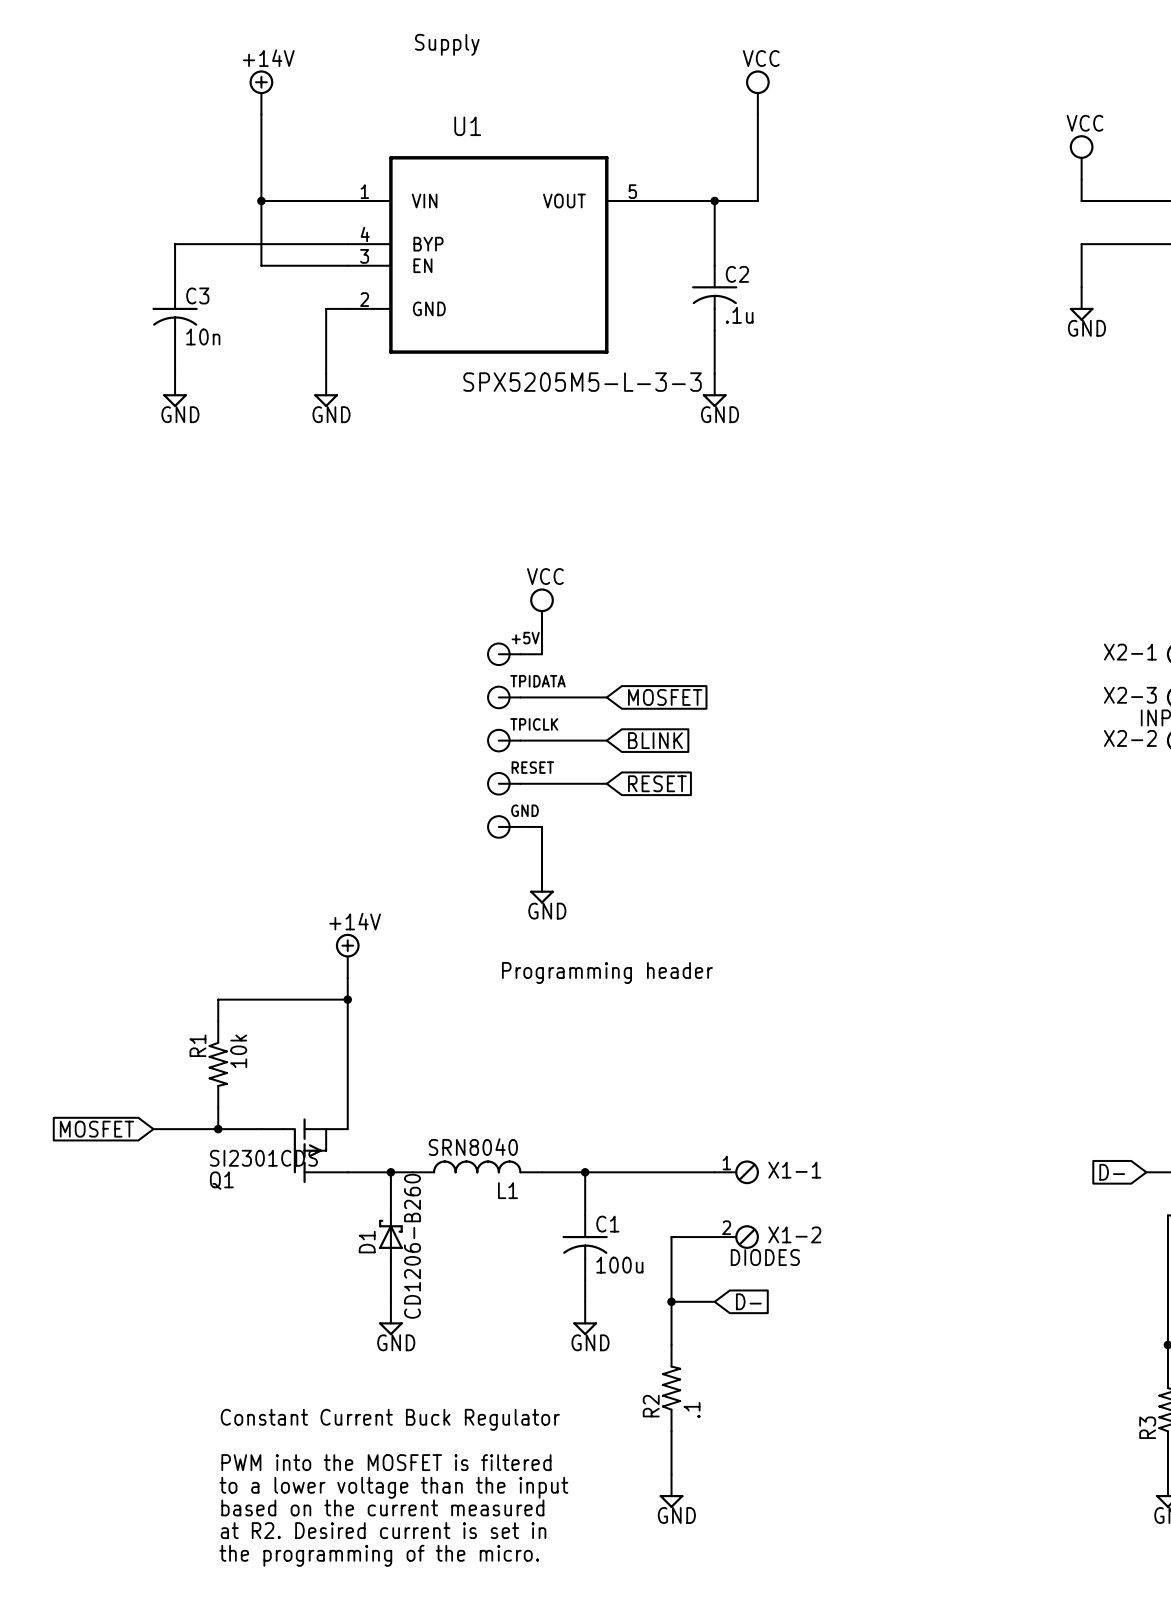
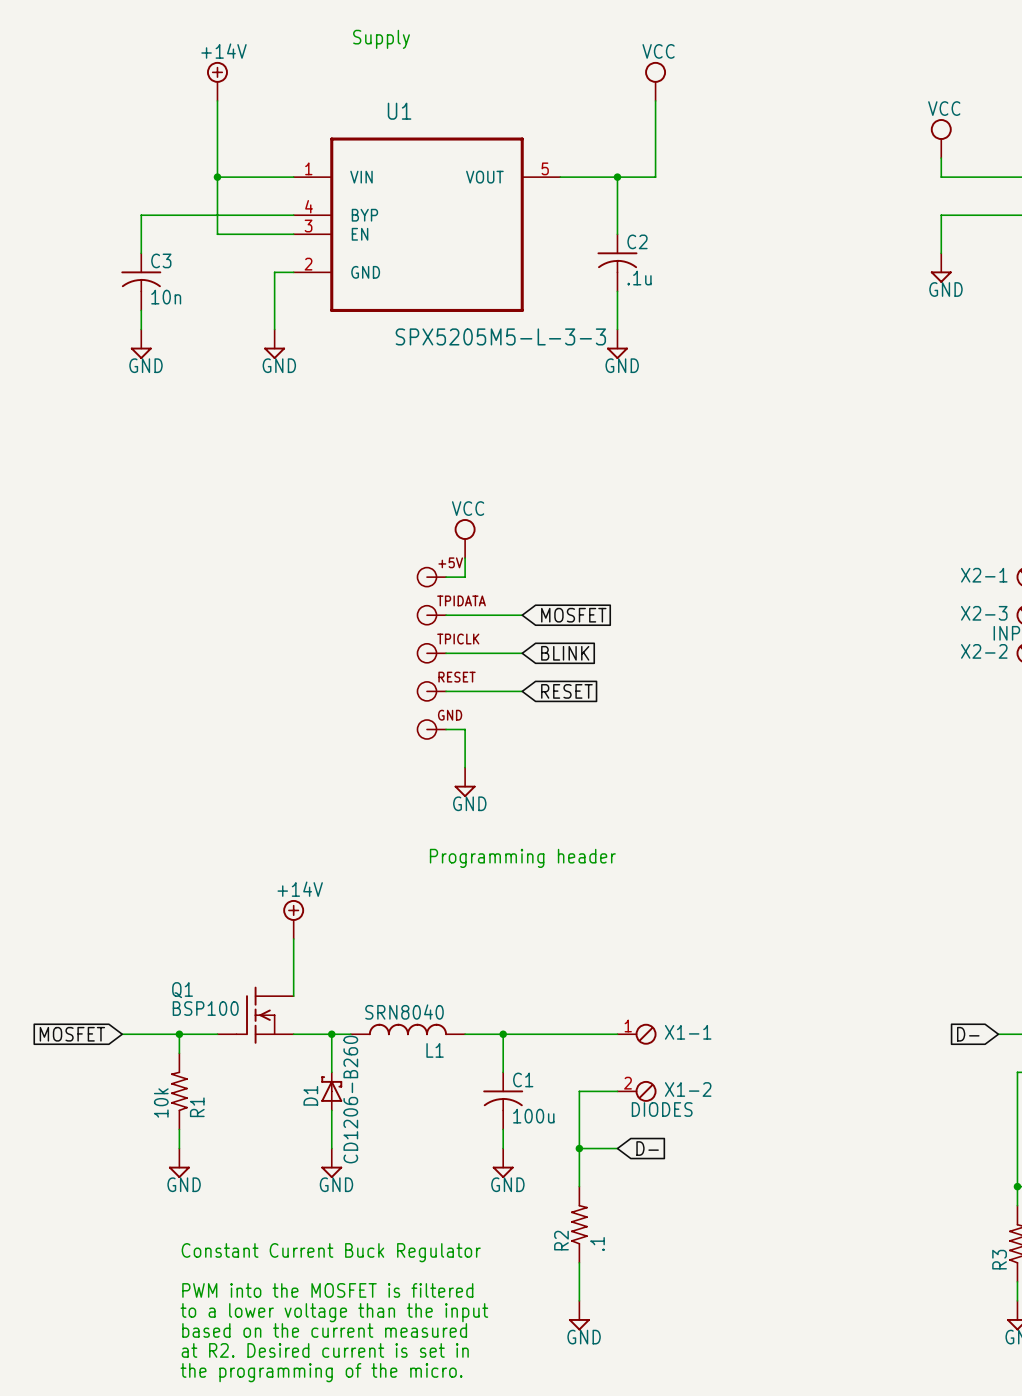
power symbol position: +14V (347, 955) -> +14V (293, 919)
wire: (347, 978) (347, 1064) -> none
wire: (347, 999) (218, 999) (218, 1021) -> none
junction: (347, 999) -> none
R1 rotation: 0° (218, 1064) -> 180° (179, 1091)
R1 position: (218, 1064) -> (179, 1091)
wire: (218, 1107) (218, 1129) -> (179, 1034) (179, 1053)
Q1 symbol: [261, 1118, 348, 1184] -> [217, 986, 294, 1044]
global label position: MOSFET (97, 1129) -> MOSFET (72, 1034)
wire: (153, 1129) (261, 1129) -> (122, 1034) (217, 1034)
junction position: (218, 1129) -> (179, 1034)
Q1 value: SI2301CDS (263, 1158) -> BSP100 (205, 1008)
Q1 name position: Q1 (221, 1180) -> Q1 (182, 990)
wire: none -> (179, 1129) (179, 1148)
power symbol: none -> GND (179, 1163)

